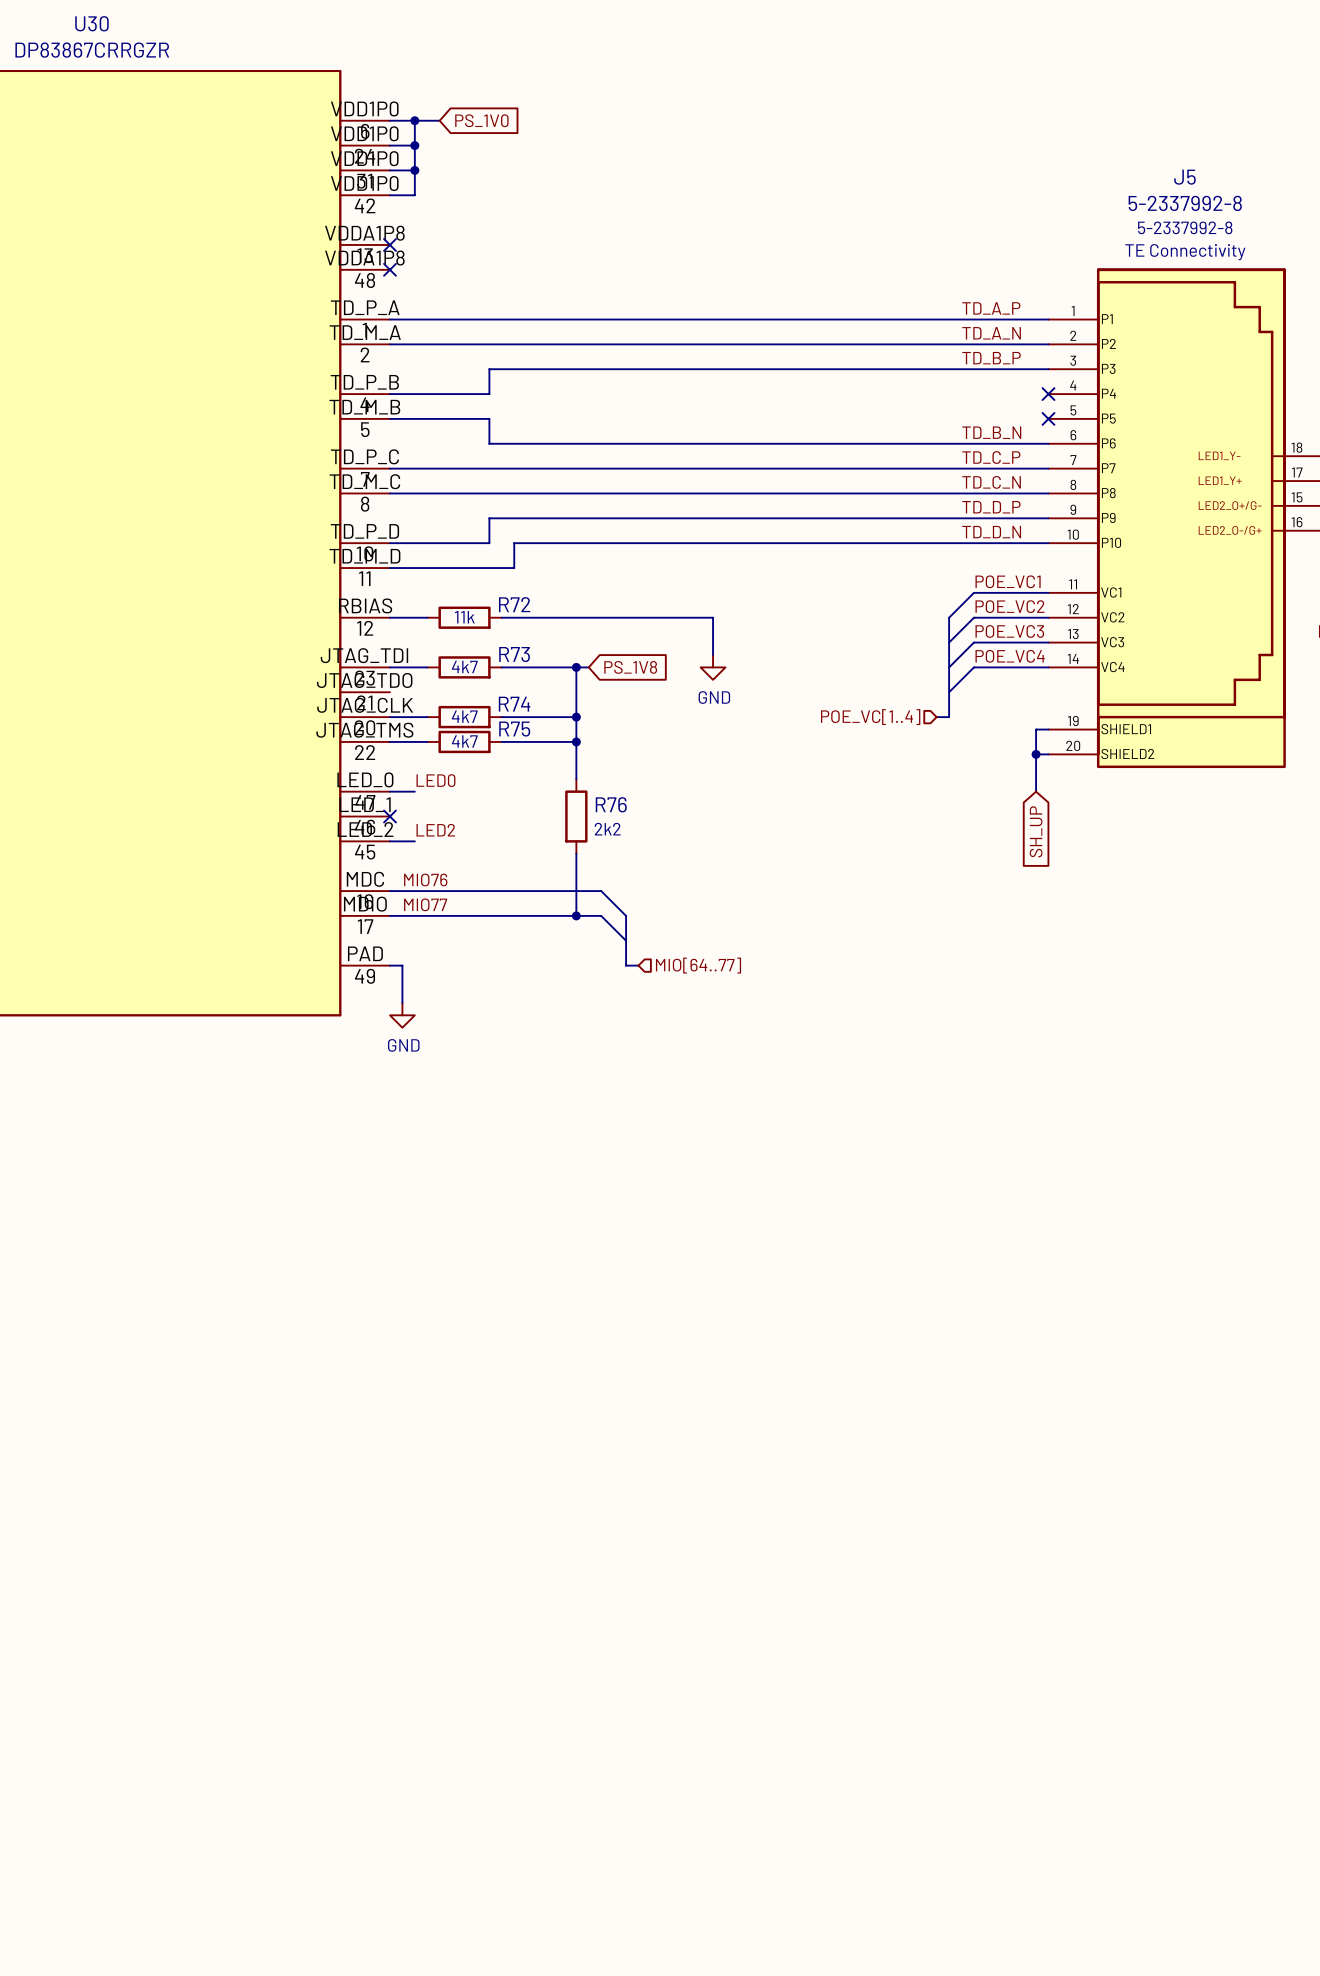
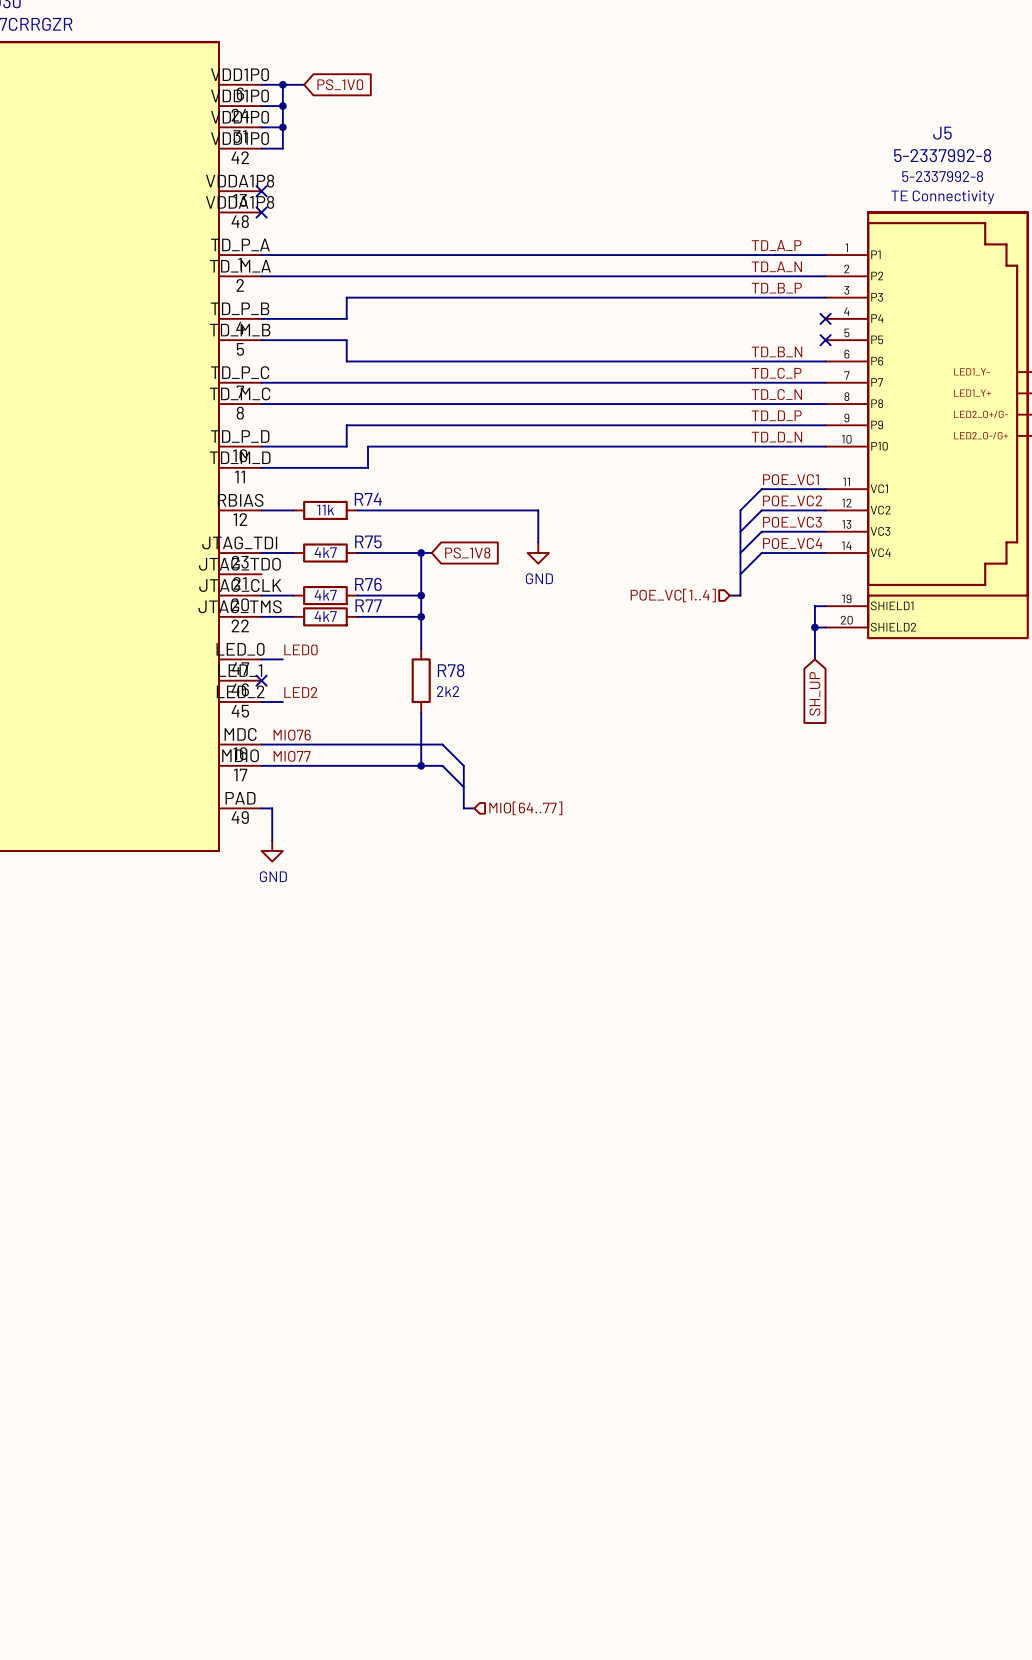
R72 name: R72 (514, 604) -> R74 (368, 499)
R73 name: R73 (514, 654) -> R75 (368, 541)
R74 name: R74 (514, 704) -> R76 (368, 584)
R75 name: R75 (514, 729) -> R77 (368, 605)
R76 name: R76 (611, 804) -> R78 (451, 670)

